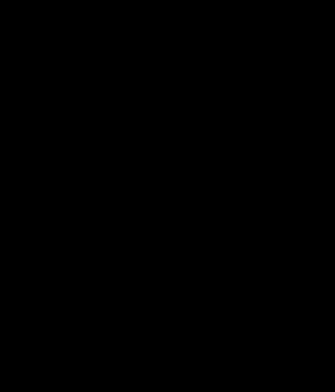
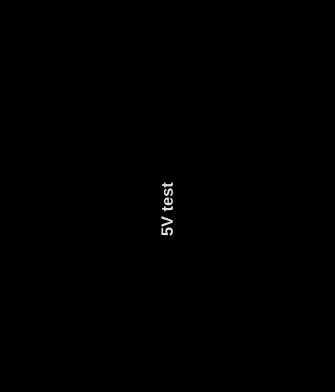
text: none -> 5V test (167, 209)

